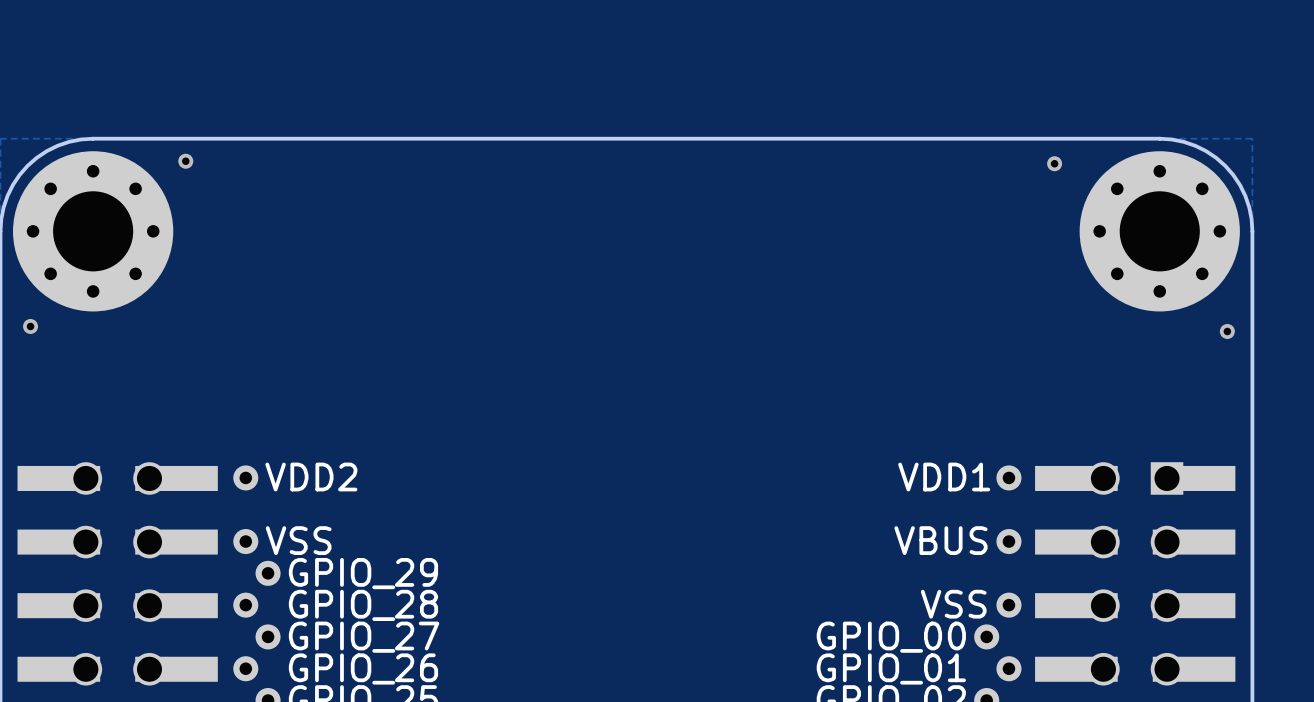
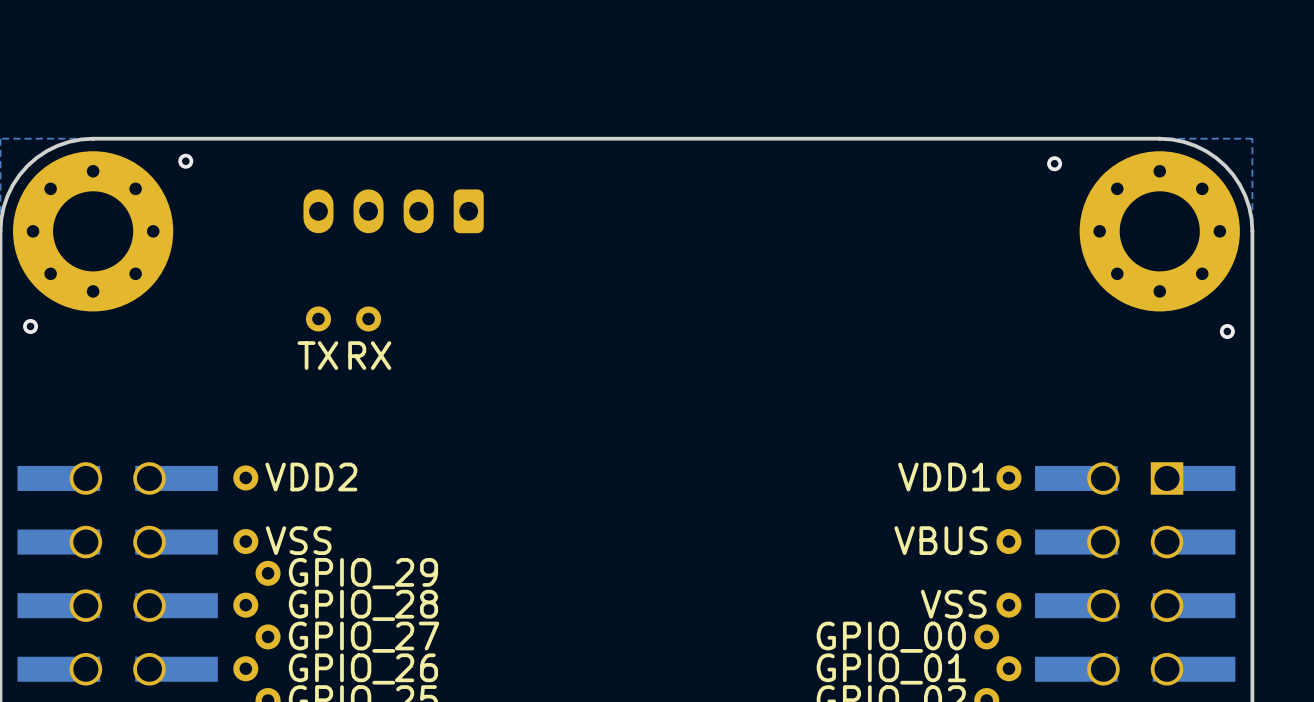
part: none -> (393, 211)
part: none -> TX (318, 318)
part: none -> RX (368, 318)

